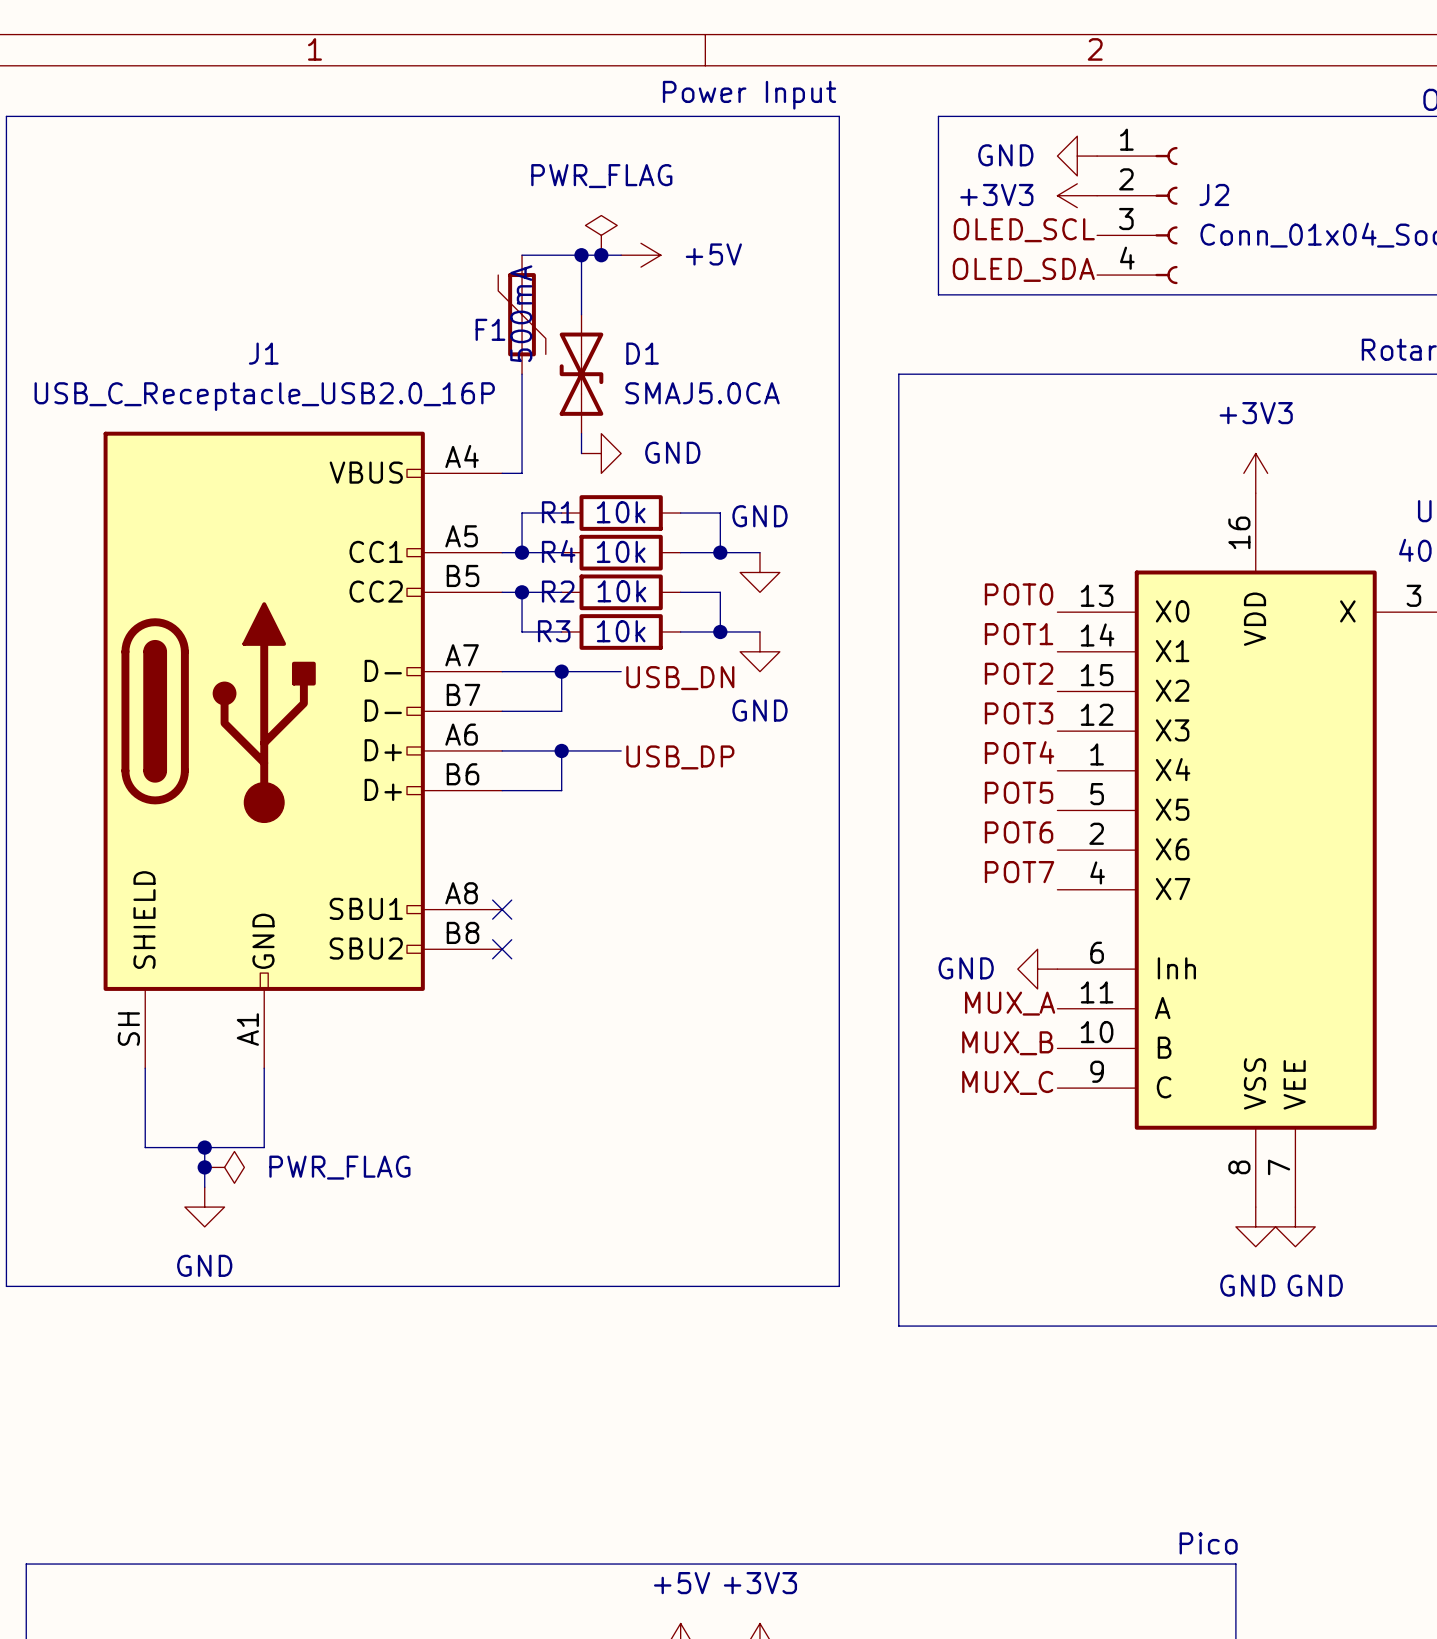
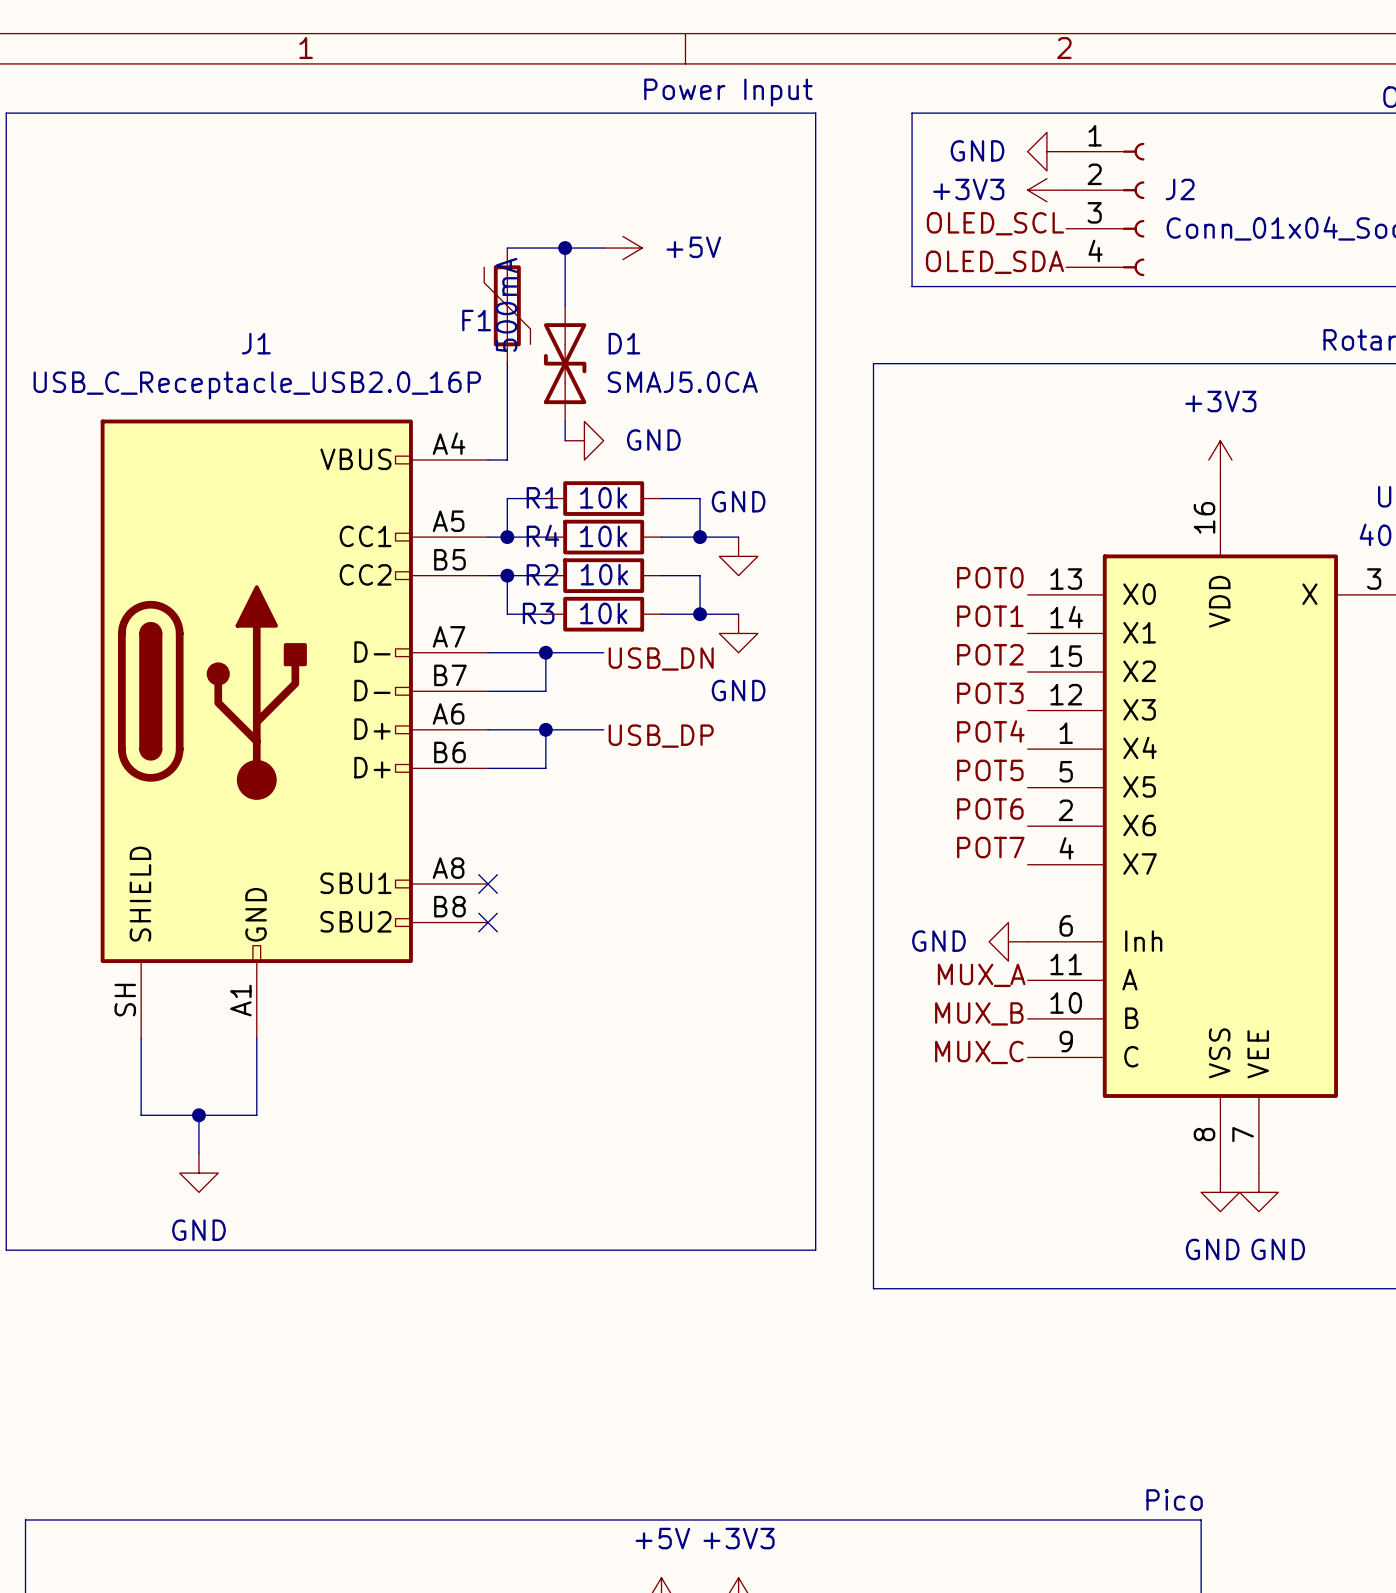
power symbol: PWR_FLAG (601, 235) -> none
junction: (601, 255) -> none
junction: (204, 1167) -> none
power symbol: PWR_FLAG (224, 1167) -> none

